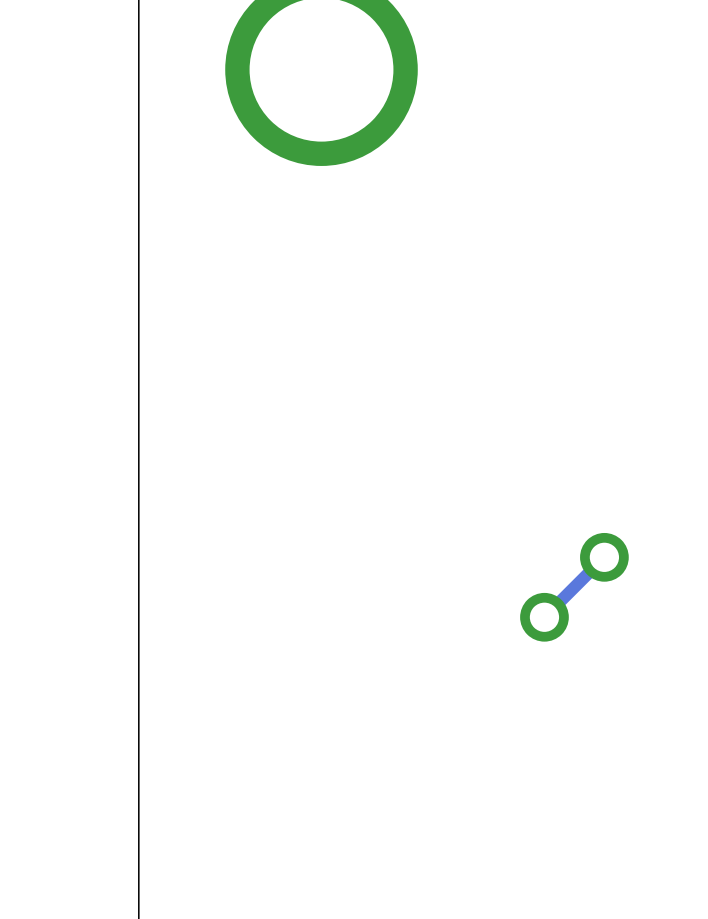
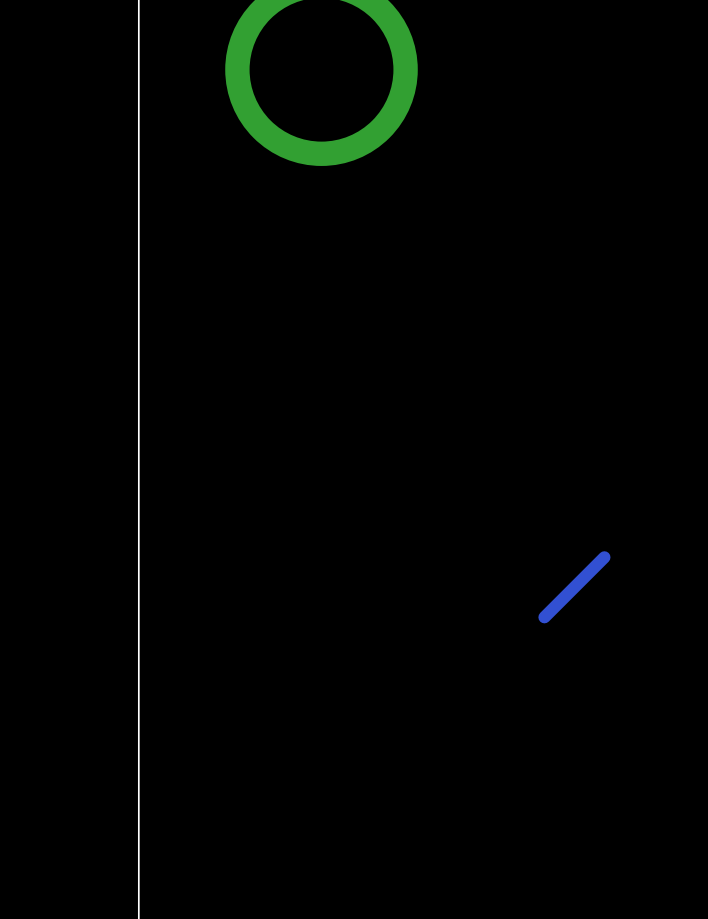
via: (604, 557) -> none
via: (544, 617) -> none

